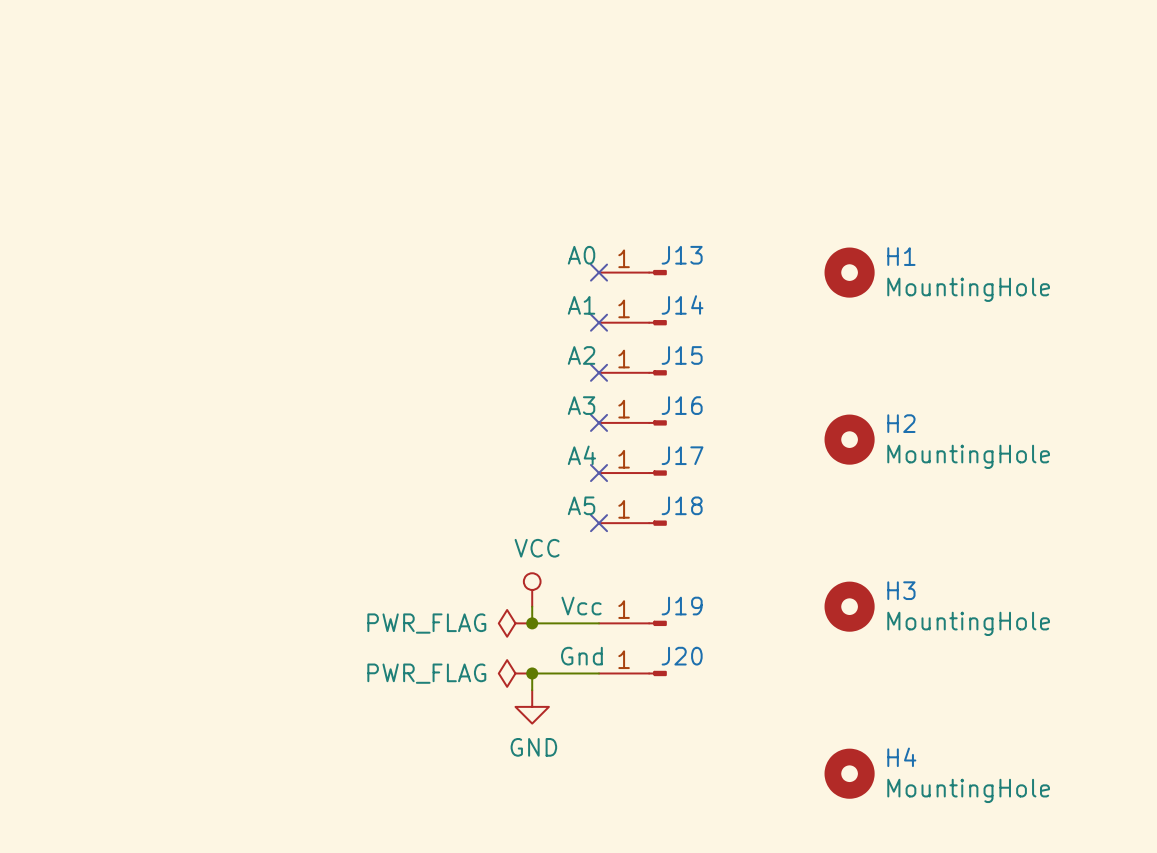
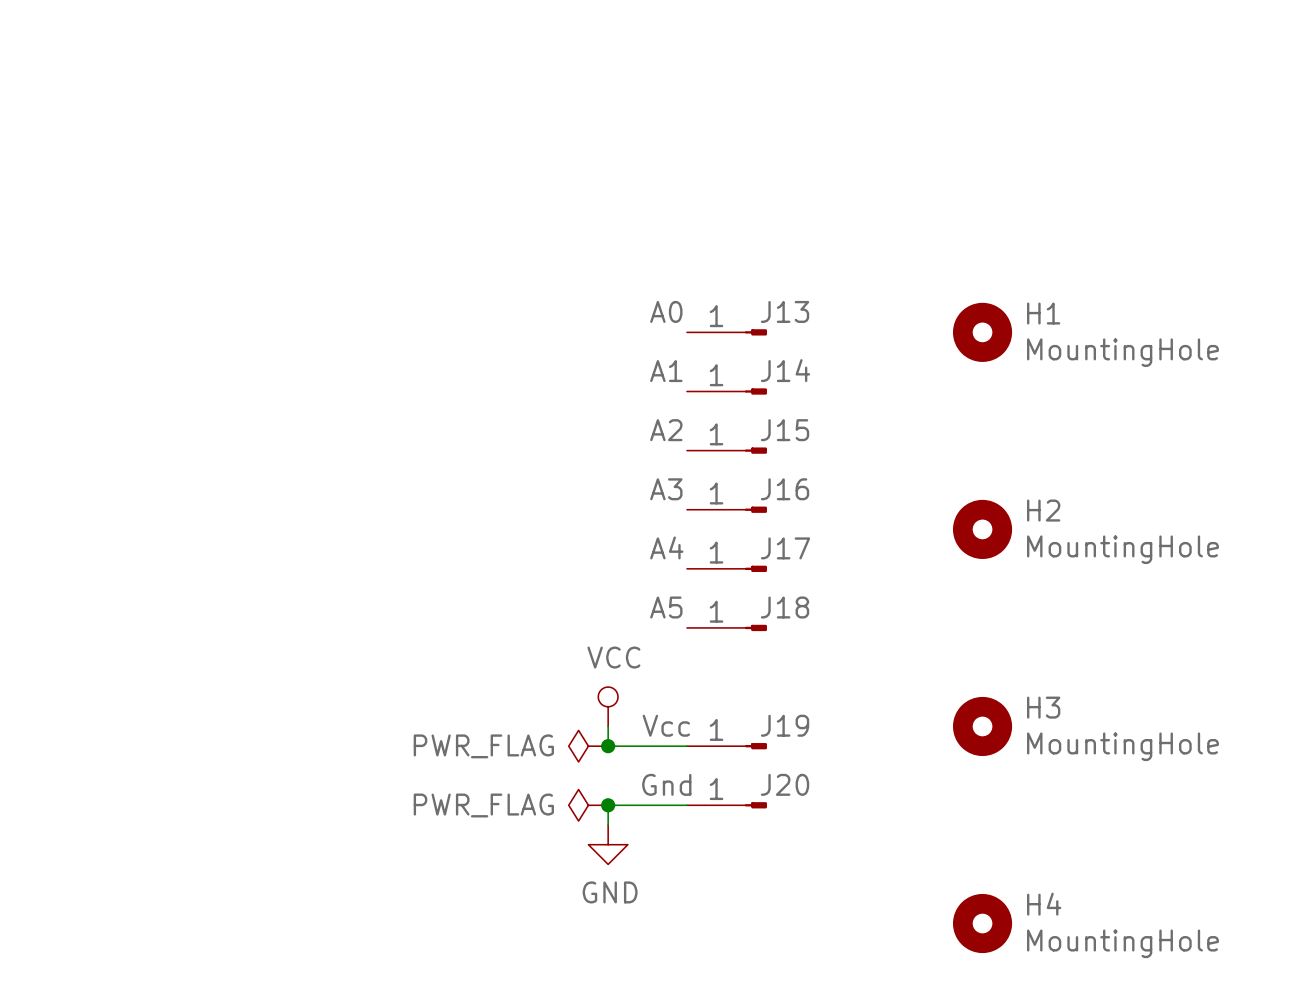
no-connect mark: (599, 272) -> none
no-connect mark: (599, 322) -> none
no-connect mark: (599, 372) -> none
no-connect mark: (599, 422) -> none
no-connect mark: (599, 473) -> none
no-connect mark: (599, 523) -> none

